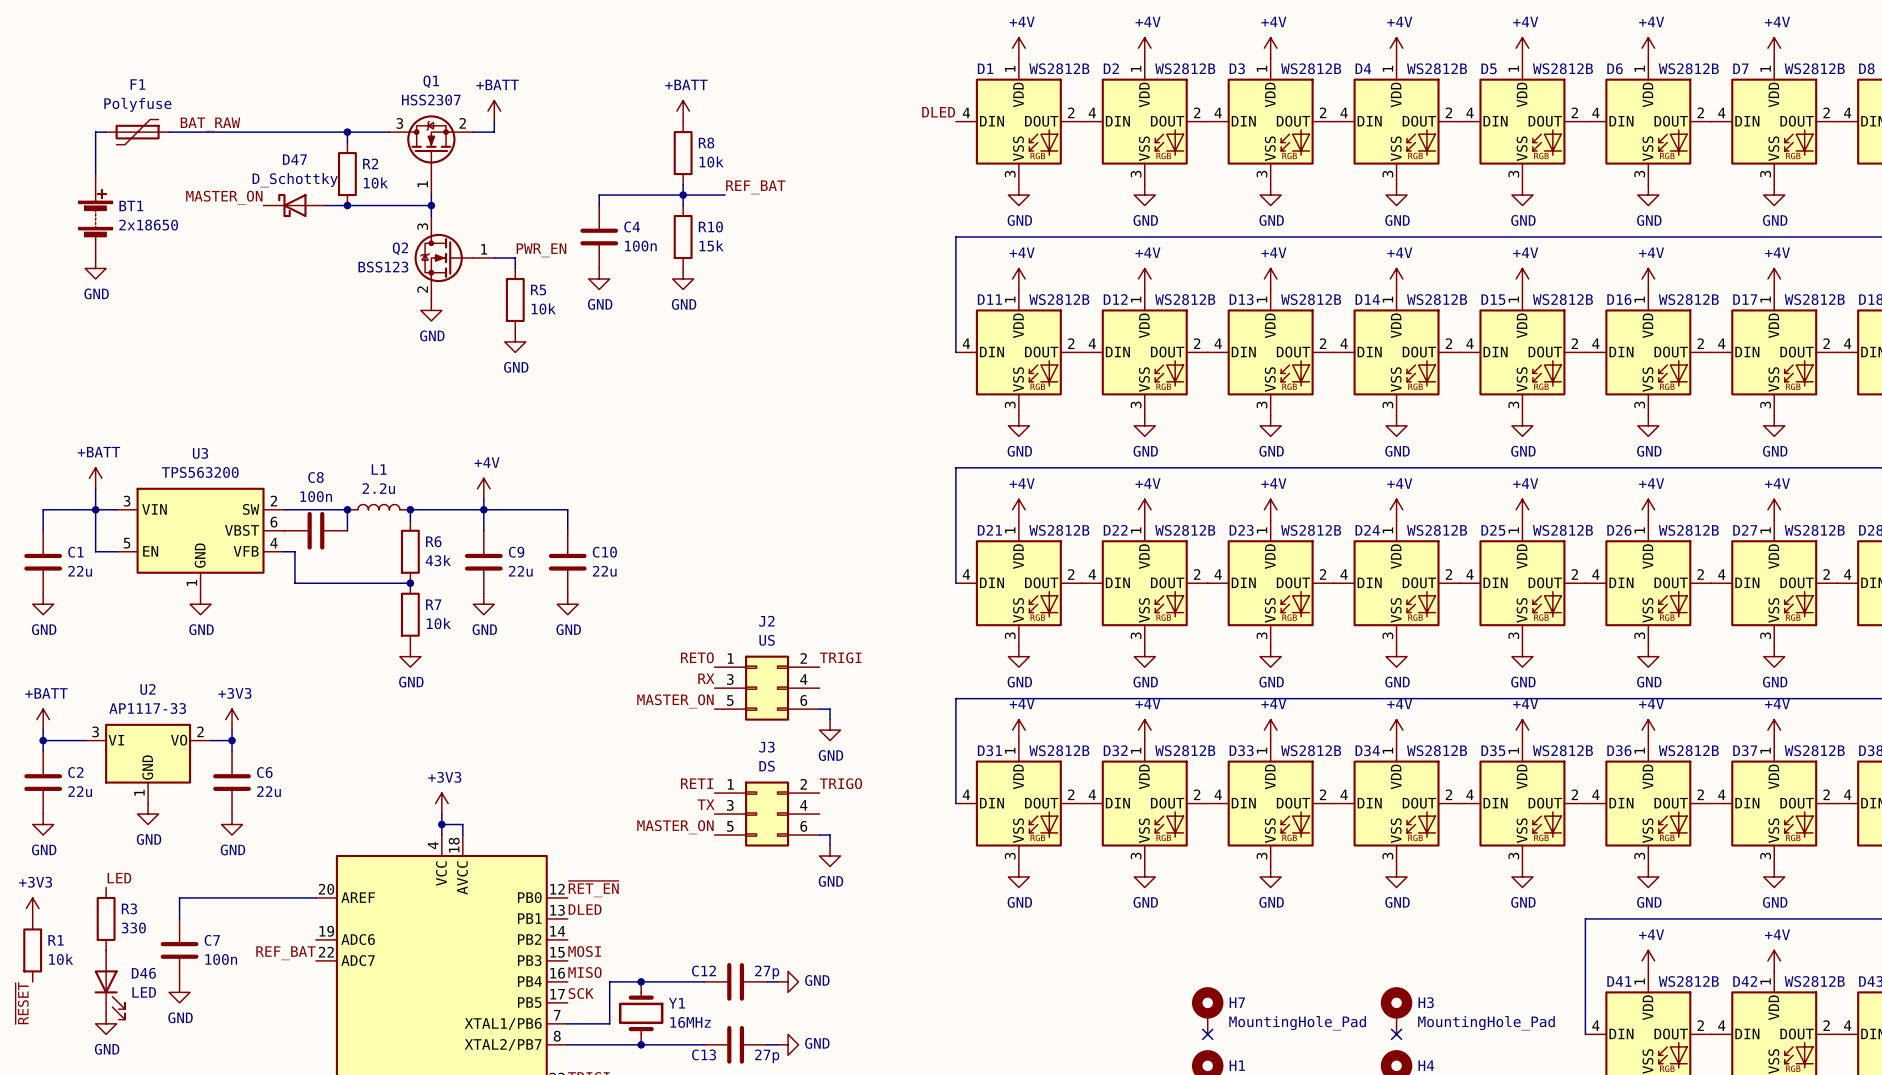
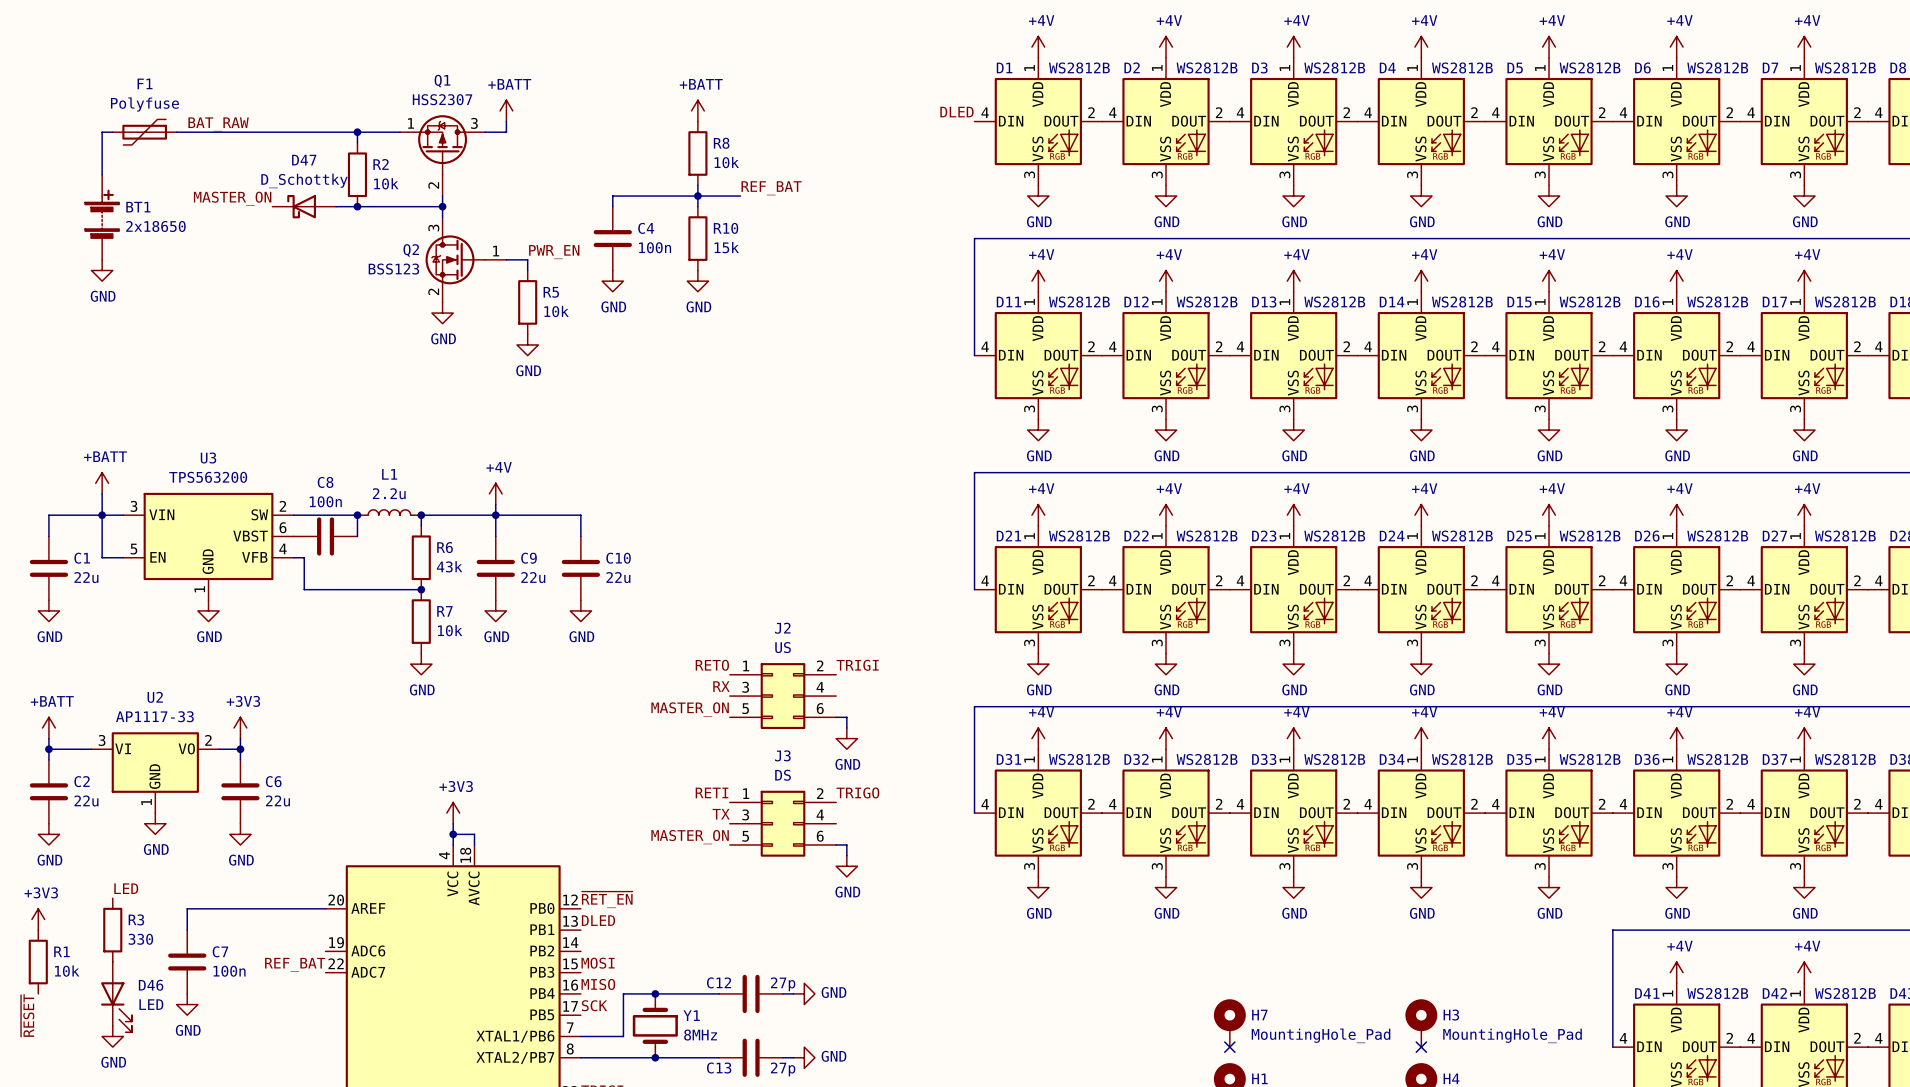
Q1 symbol: [389, 115, 474, 196] -> [400, 115, 486, 197]
Y1 value: 16MHz (690, 1022) -> 8MHz (700, 1035)

